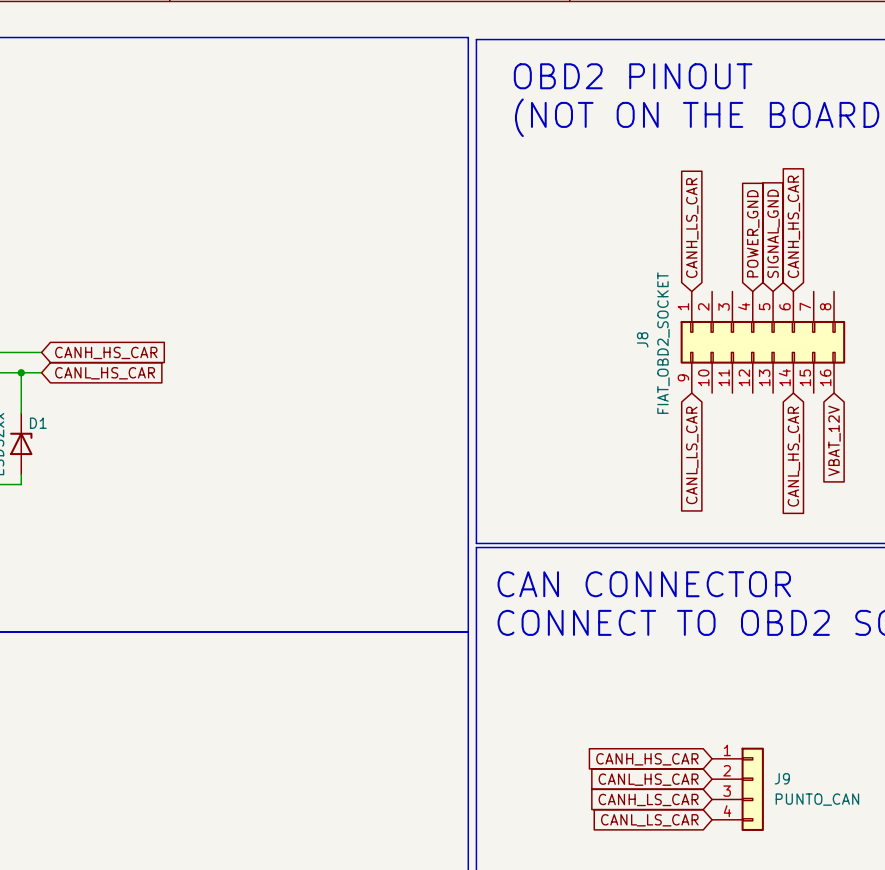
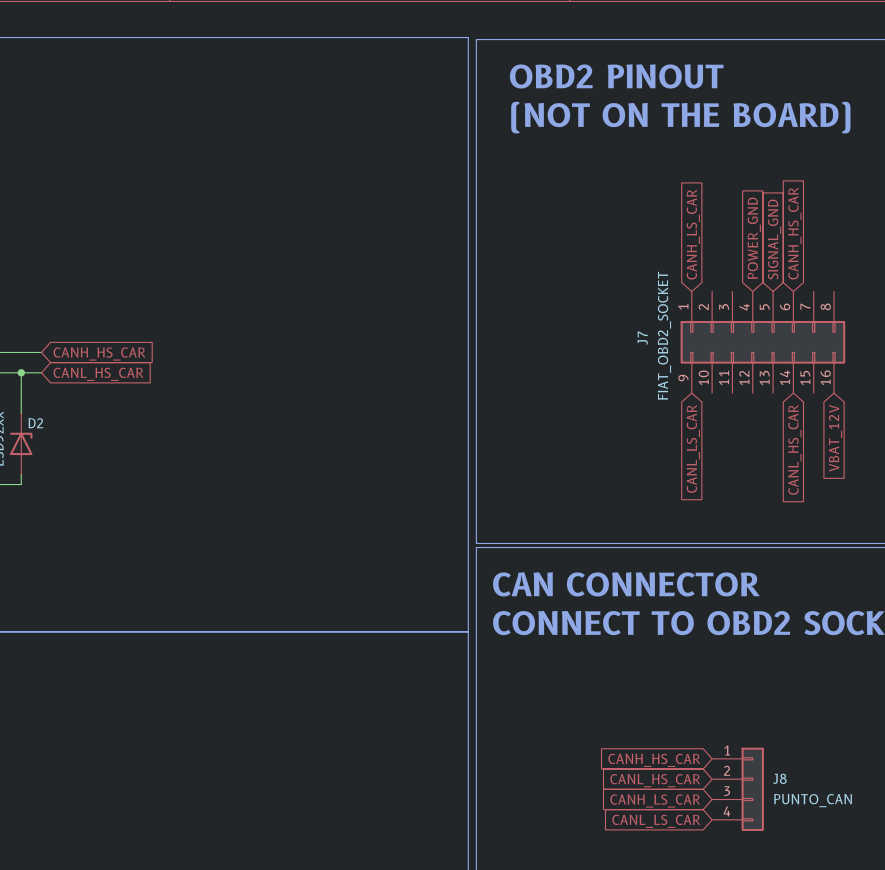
J8 name: J8 (642, 339) -> J7 (642, 338)
D1 name: D1 (38, 423) -> D2 (35, 423)
J9 name: J9 (782, 778) -> J8 (779, 778)

